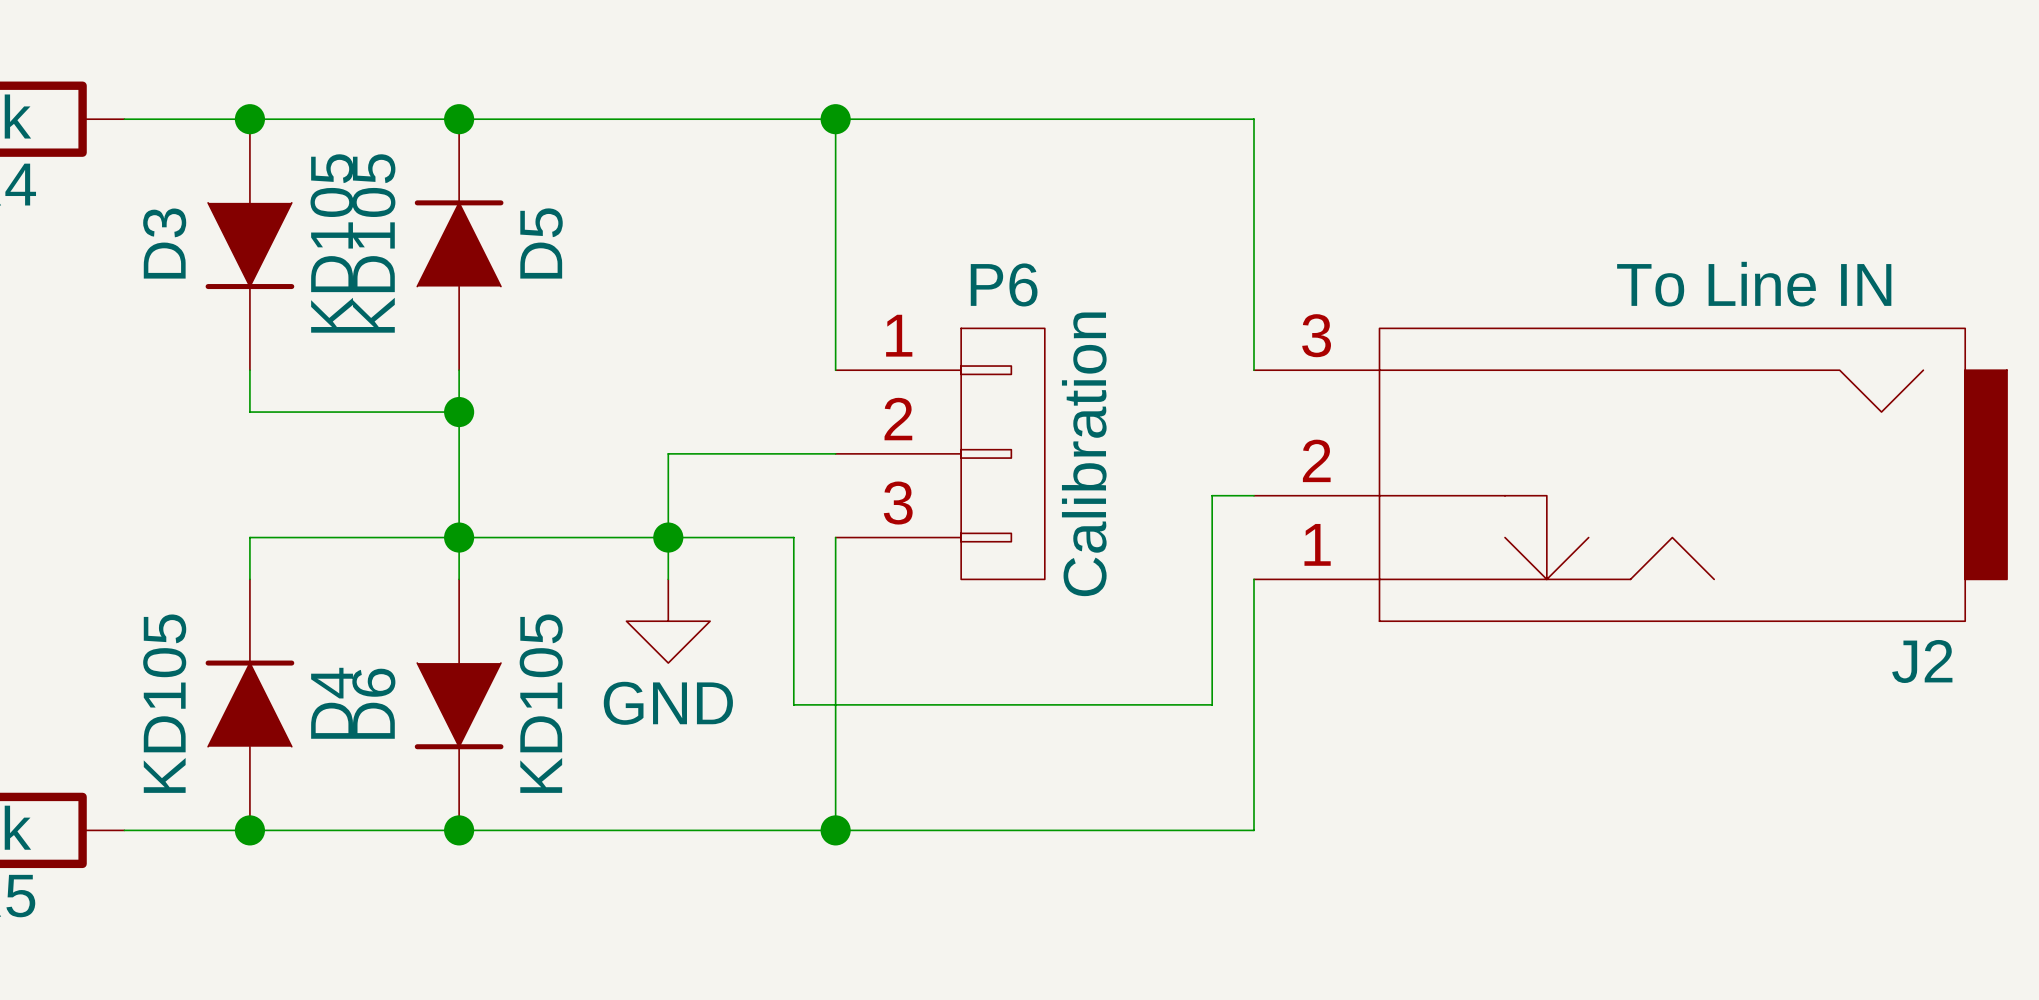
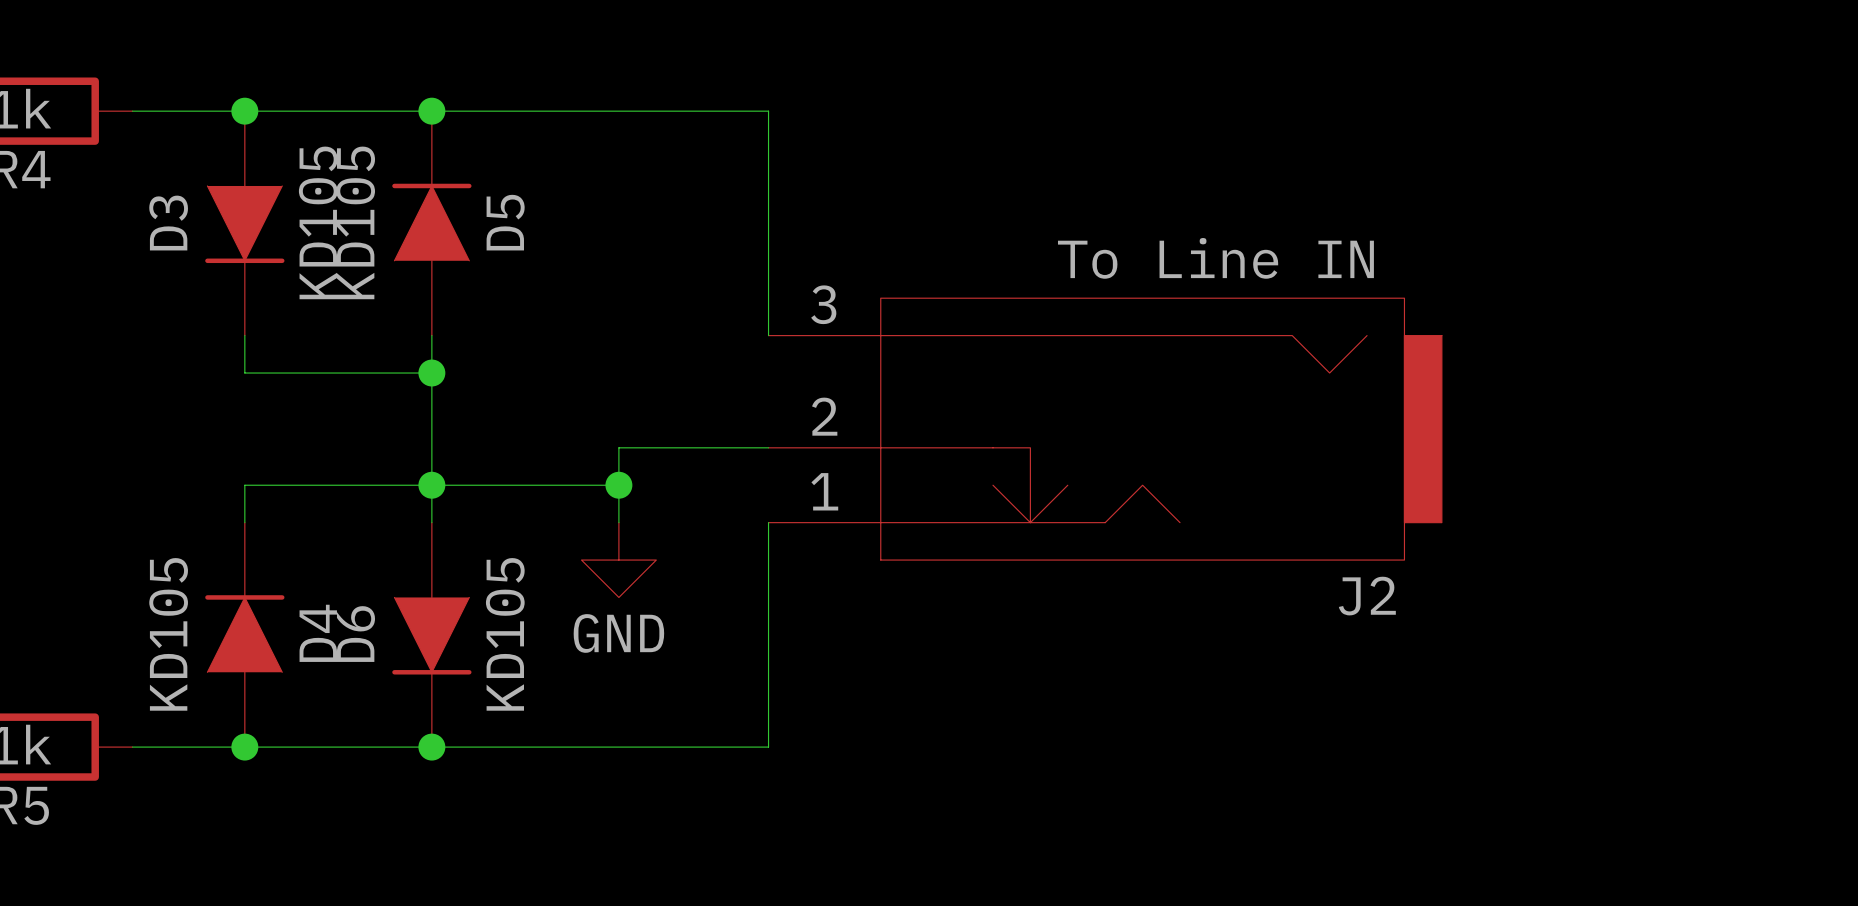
wire: (835, 119) (1253, 119) (1253, 370) -> none
junction: (835, 119) -> none
wire: (835, 453) (668, 453) (668, 495) -> (768, 447) (618, 447)
P6: Calibration (940, 453) -> none
J2 position: (1630, 474) -> (1105, 429)
wire: (1253, 495) (1212, 495) (1212, 704) (793, 704) (793, 537) (668, 537) -> none
wire: (835, 537) (835, 579) -> none
wire: (1253, 579) (1253, 830) (835, 830) -> none
junction: (835, 830) -> none

